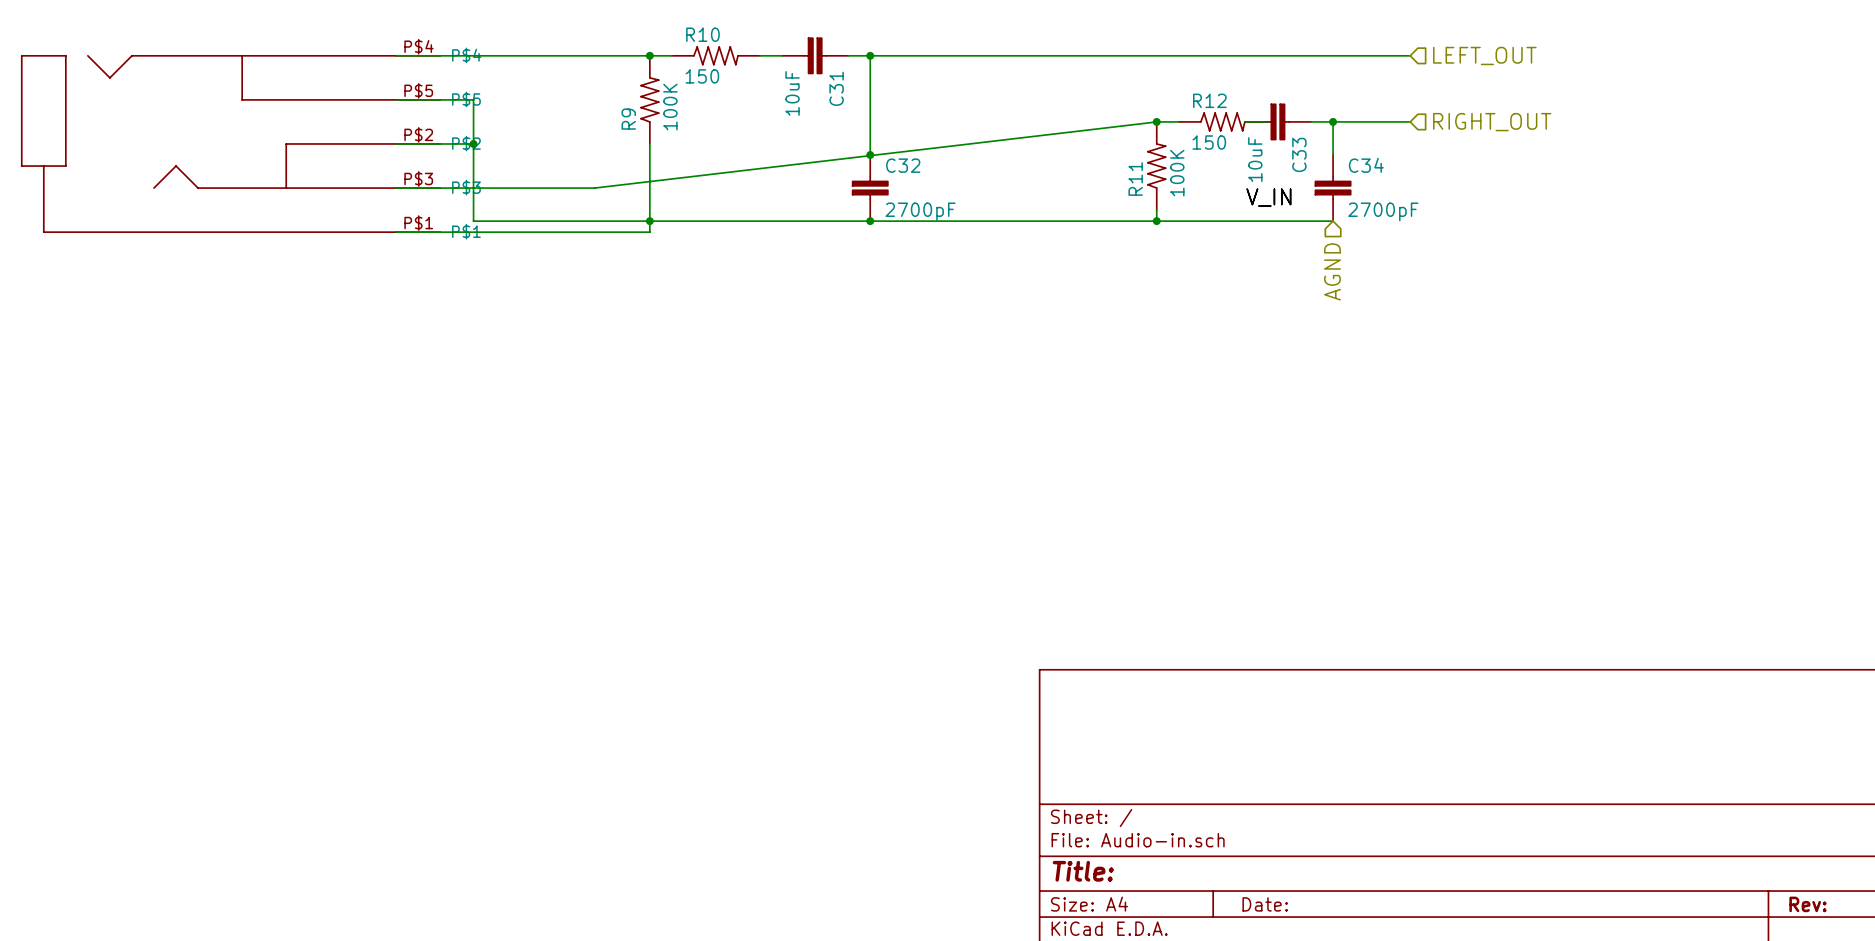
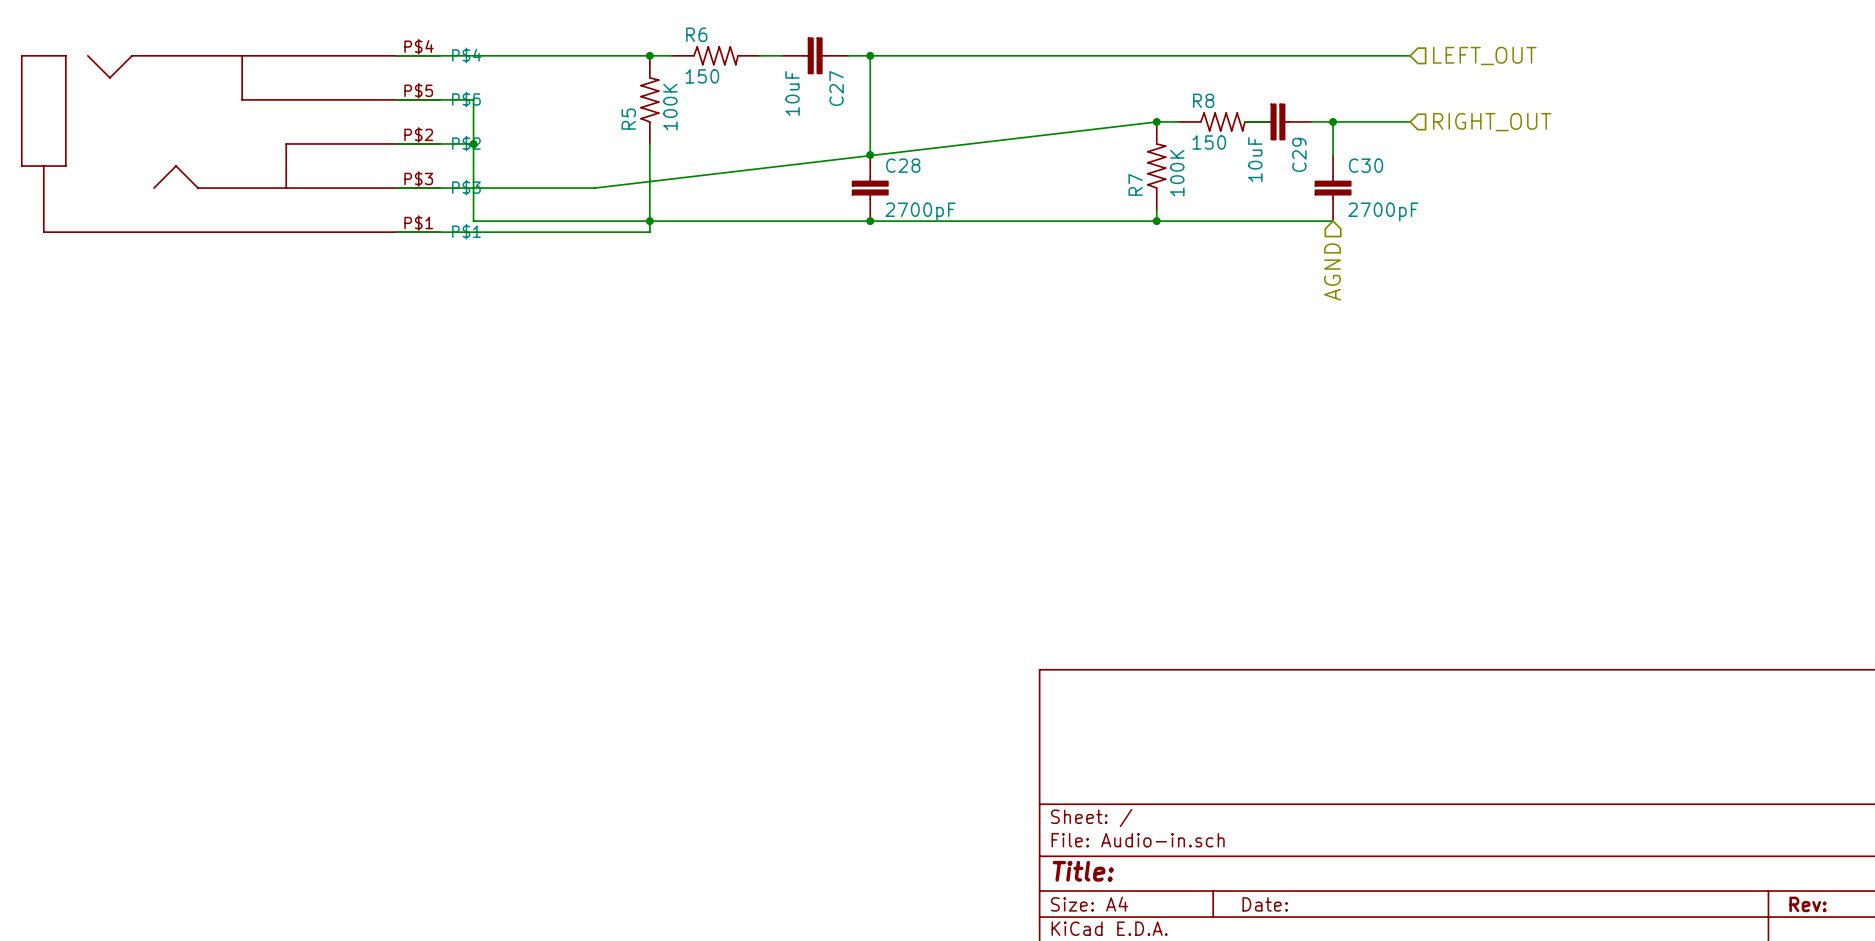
R10 name: R10 (702, 34) -> R6 (696, 34)
C31 name: C31 (836, 88) -> C27 (836, 88)
R12 name: R12 (1209, 100) -> R8 (1203, 100)
R9 name: R9 (628, 119) -> R5 (628, 119)
C33 name: C33 (1299, 154) -> C29 (1299, 154)
C32 name: C32 (903, 165) -> C28 (903, 165)
C34 name: C34 (1366, 165) -> C30 (1366, 165)
R11 name: R11 (1135, 179) -> R7 (1135, 184)
label: V_IN (1268, 197) -> none

